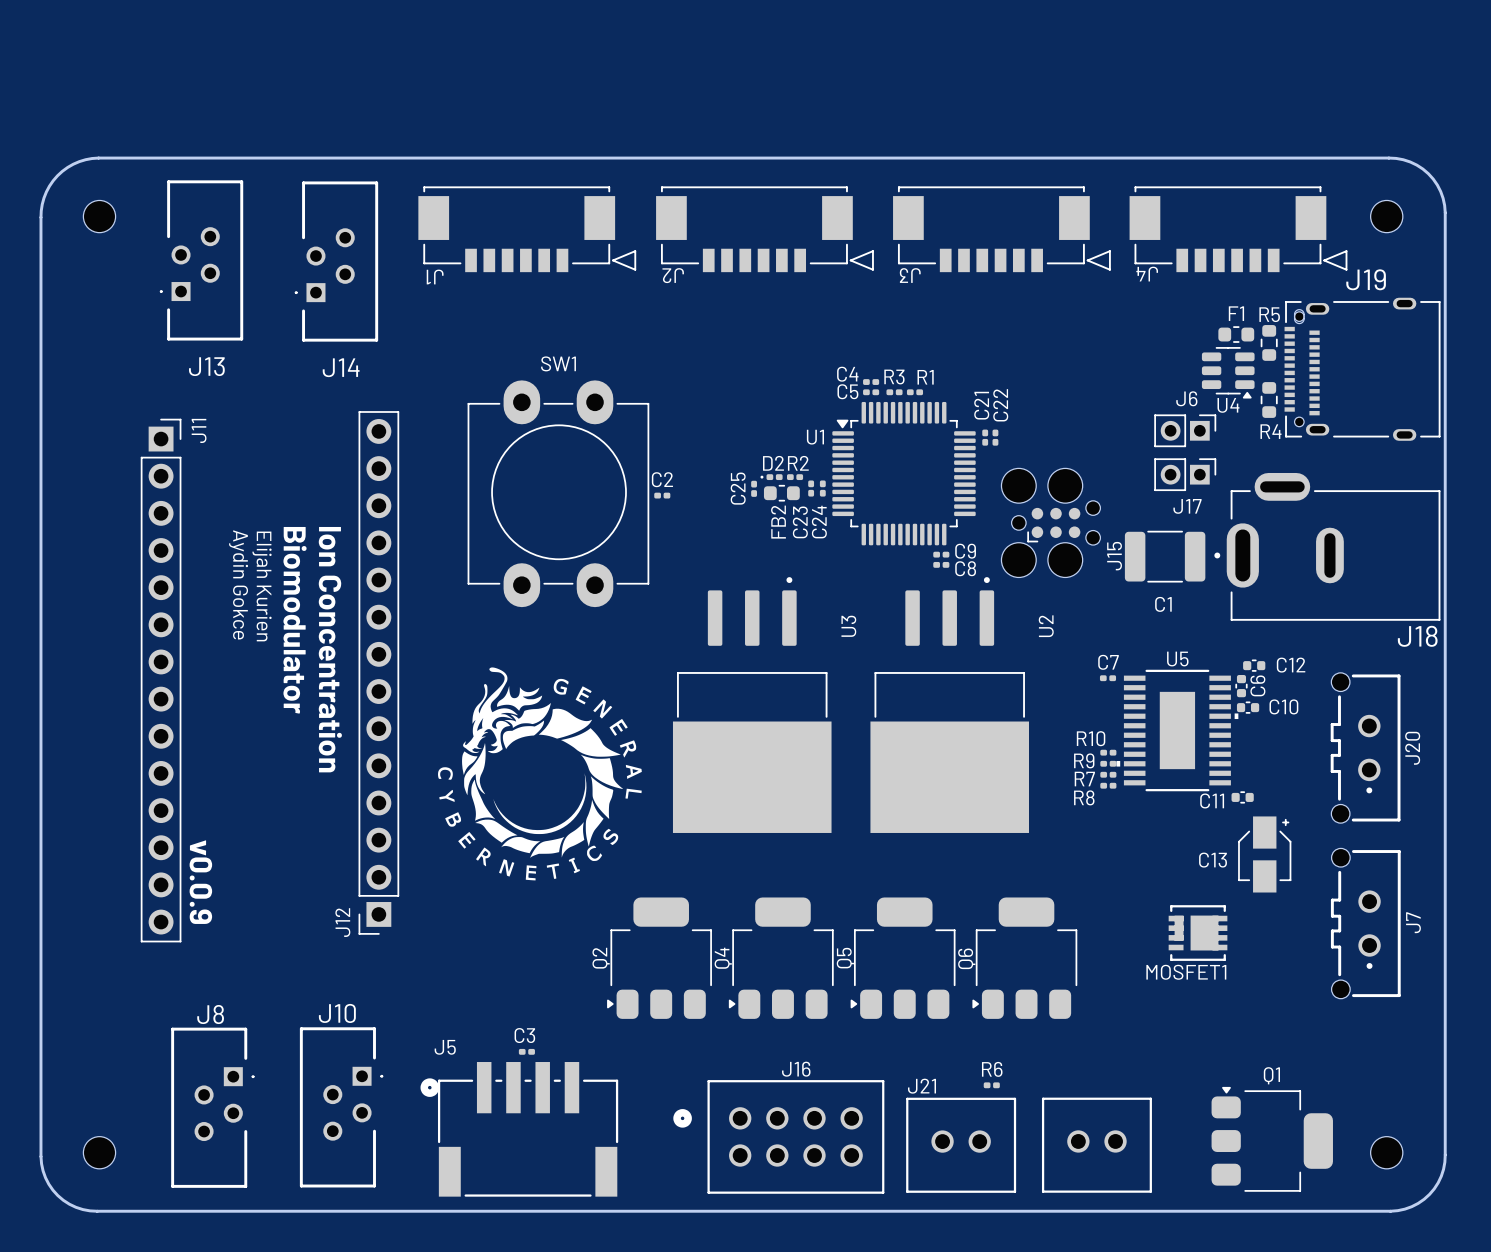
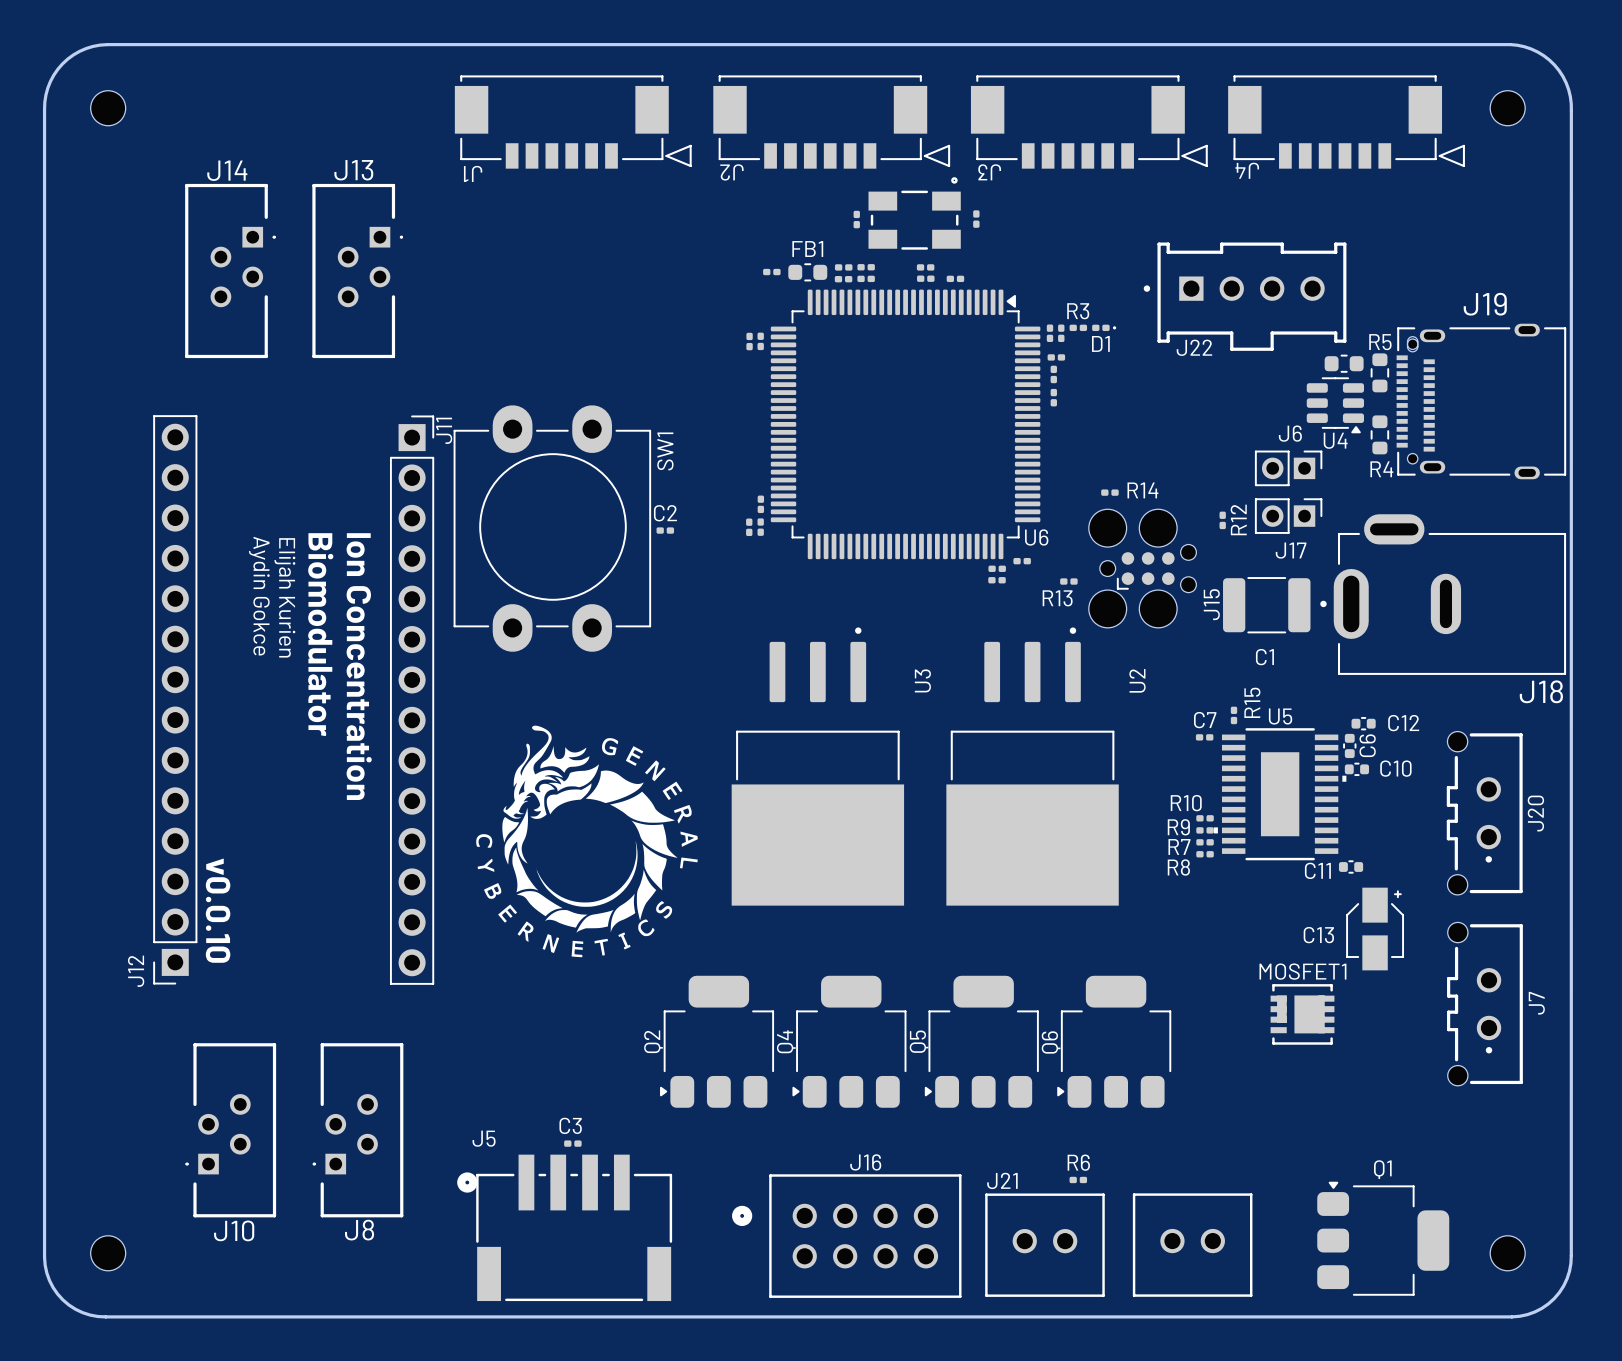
board edge: none -> (107, 44) (86, 48) (67, 59) (57, 69) (47, 88) (44, 109) (44, 236)
part: none -> (914, 213)
part: none -> (856, 219)
part: none -> (976, 219)
part position: (99, 216) -> (108, 108)
part position: (1386, 216) -> (1507, 108)
board edge: (40, 217) (46, 191) (57, 175) (79, 161) (98, 158) (1388, 158) (1410, 161) (1422, 169) (1433, 179) (1440, 191) (1445, 212) (1445, 1154) -> (107, 44) (1510, 44) (1531, 48) (1549, 60) (1562, 76) (1568, 89) (1571, 103) (1571, 1255)
J1 position: (527, 229) -> (573, 122)
J2 position: (764, 229) -> (831, 122)
J3 position: (1001, 229) -> (1089, 122)
J4 position: (1238, 229) -> (1346, 122)
part: none -> (843, 267)
part: none -> (866, 267)
part: none -> (925, 267)
part: none -> (771, 272)
FB1: none -> (807, 272)
part: none -> (843, 279)
part: none -> (866, 278)
part: none -> (925, 278)
part: none -> (955, 278)
J13 rotation: 0° (201, 260) -> 180° (357, 270)
J13 position: (201, 260) -> (357, 270)
J14 rotation: 0° (336, 261) -> 180° (230, 270)
J14 position: (336, 261) -> (230, 270)
J22: none -> (1245, 296)
D1: none -> (1104, 327)
part: none -> (1049, 333)
part: none -> (1061, 333)
part: none -> (760, 341)
F1 name: F1 (1236, 313) -> none
part: none -> (749, 341)
part: none -> (1056, 357)
part: none -> (1053, 374)
SW1 name rotation: 0° (558, 363) -> 90° counterclockwise (665, 451)
SW1 name position: SW1 (558, 363) -> SW1 (665, 451)
part: none -> (1053, 397)
C4: (871, 382) -> none
U6: none -> (905, 424)
C5: (871, 392) -> none
R3 position: (894, 392) -> (1078, 327)
R1: (914, 392) -> none
J11 name position: J11 (199, 430) -> J11 (444, 430)
C21: (985, 437) -> none
C22: (995, 437) -> none
R14: none -> (1109, 492)
part: none -> (760, 504)
U1: (904, 473) -> none
D2: (771, 477) -> none
R2: (795, 477) -> none
R12: none -> (1222, 520)
part: none -> (749, 527)
part: none -> (760, 527)
C25: (754, 488) -> none
C23: (811, 488) -> none
C24: (822, 488) -> none
SW1 position: (558, 493) -> (552, 528)
FB2: (781, 493) -> none
C2 position: (662, 495) -> (665, 530)
part: none -> (1022, 561)
part: none -> (997, 568)
part: none -> (997, 580)
R13: none -> (1068, 581)
C9: (941, 554) -> none
C8: (941, 564) -> none
text position: Aydin Gokce (238, 584) -> Aydin Gokce (259, 596)
text position: Elijah Kurien (262, 586) -> Elijah Kurien (284, 597)
text position: Biomodulator (295, 620) -> Biomodulator (320, 634)
text position: Ion Concentration (330, 649) -> Ion Concentration (359, 666)
R15: none -> (1233, 715)
J12 position: (378, 672) -> (175, 699)
J11 position: (161, 680) -> (412, 700)
text: v0.0.9 (200, 882) -> v0.0.10 (218, 910)
MOSFET1 name position: MOSFET1 (1186, 972) -> MOSFET1 (1302, 971)
J8 rotation: 0° (212, 1107) -> 180° (358, 1130)
J8 position: (212, 1107) -> (358, 1130)
J10 rotation: 0° (341, 1107) -> 180° (230, 1130)
J10 position: (341, 1107) -> (230, 1130)

